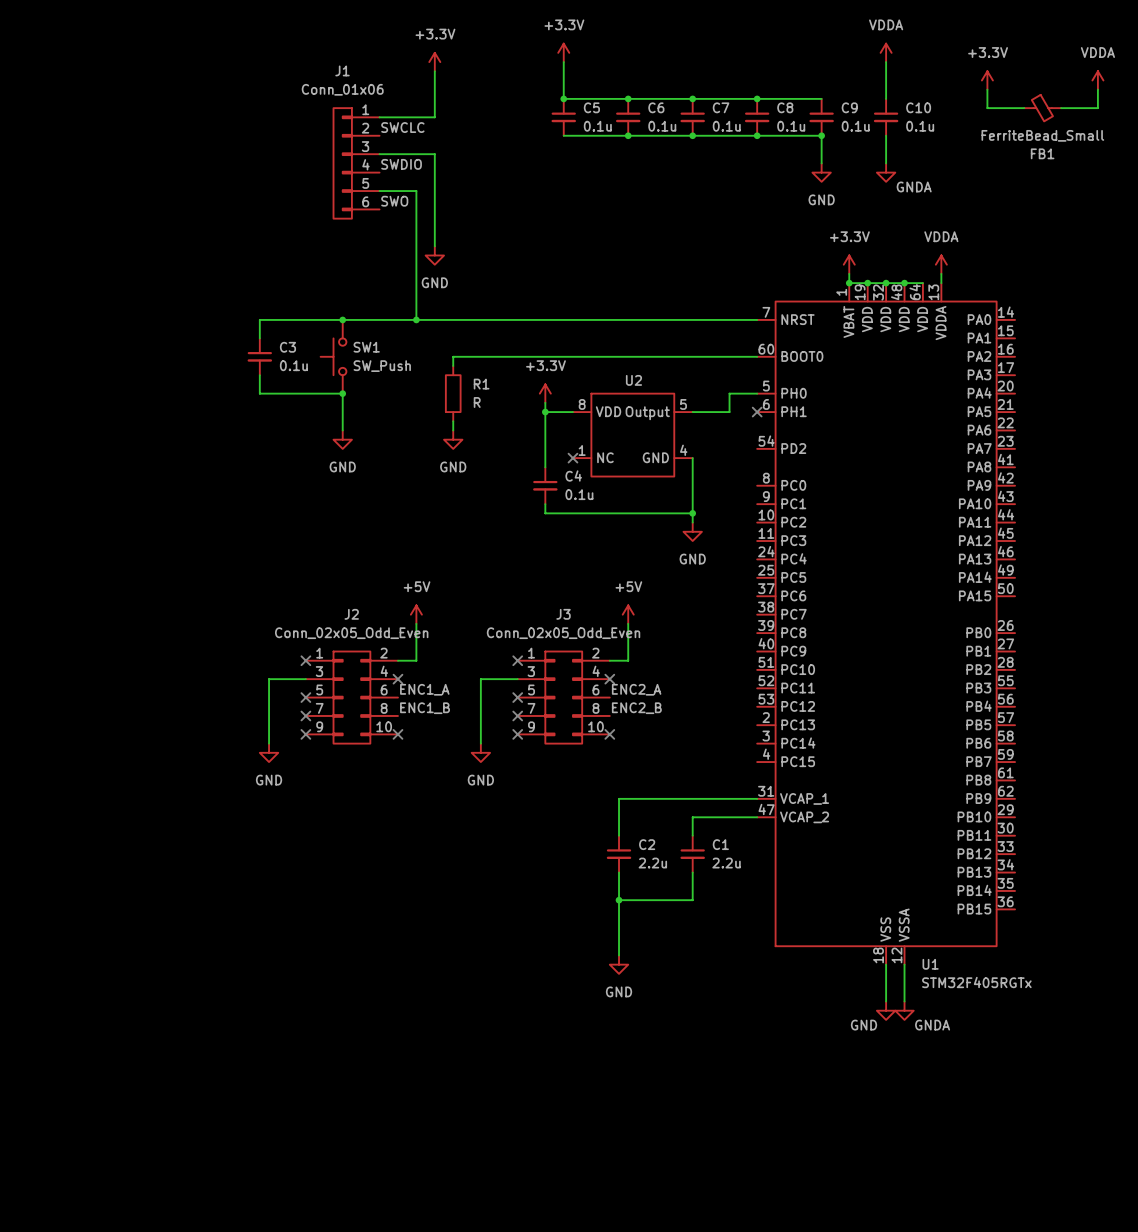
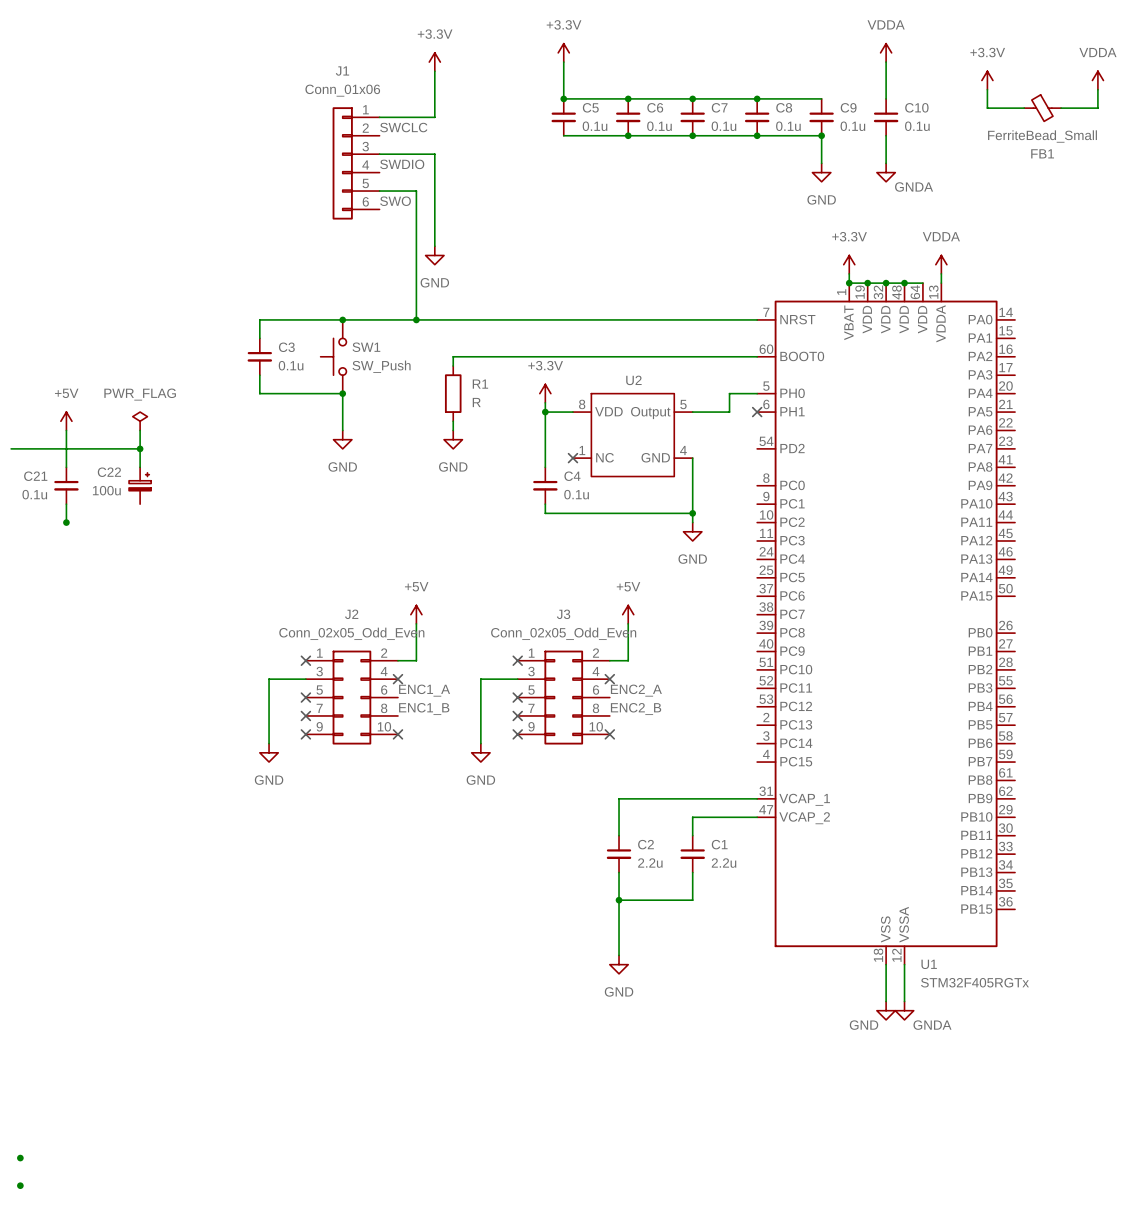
power symbol: none -> +5V (66, 421)
power symbol: none -> PWR_FLAG (140, 421)
wire: none -> (66, 430) (66, 467)
wire: none -> (140, 430) (140, 467)
wire: none -> (11, 448) (140, 448)
junction: none -> (140, 448)
C21: none -> 0.1u (66, 485)
C22: none -> 100u (140, 485)
wire: none -> (66, 504) (66, 522)
junction: none -> (66, 522)
junction: none -> (20, 1158)
junction: none -> (20, 1185)

